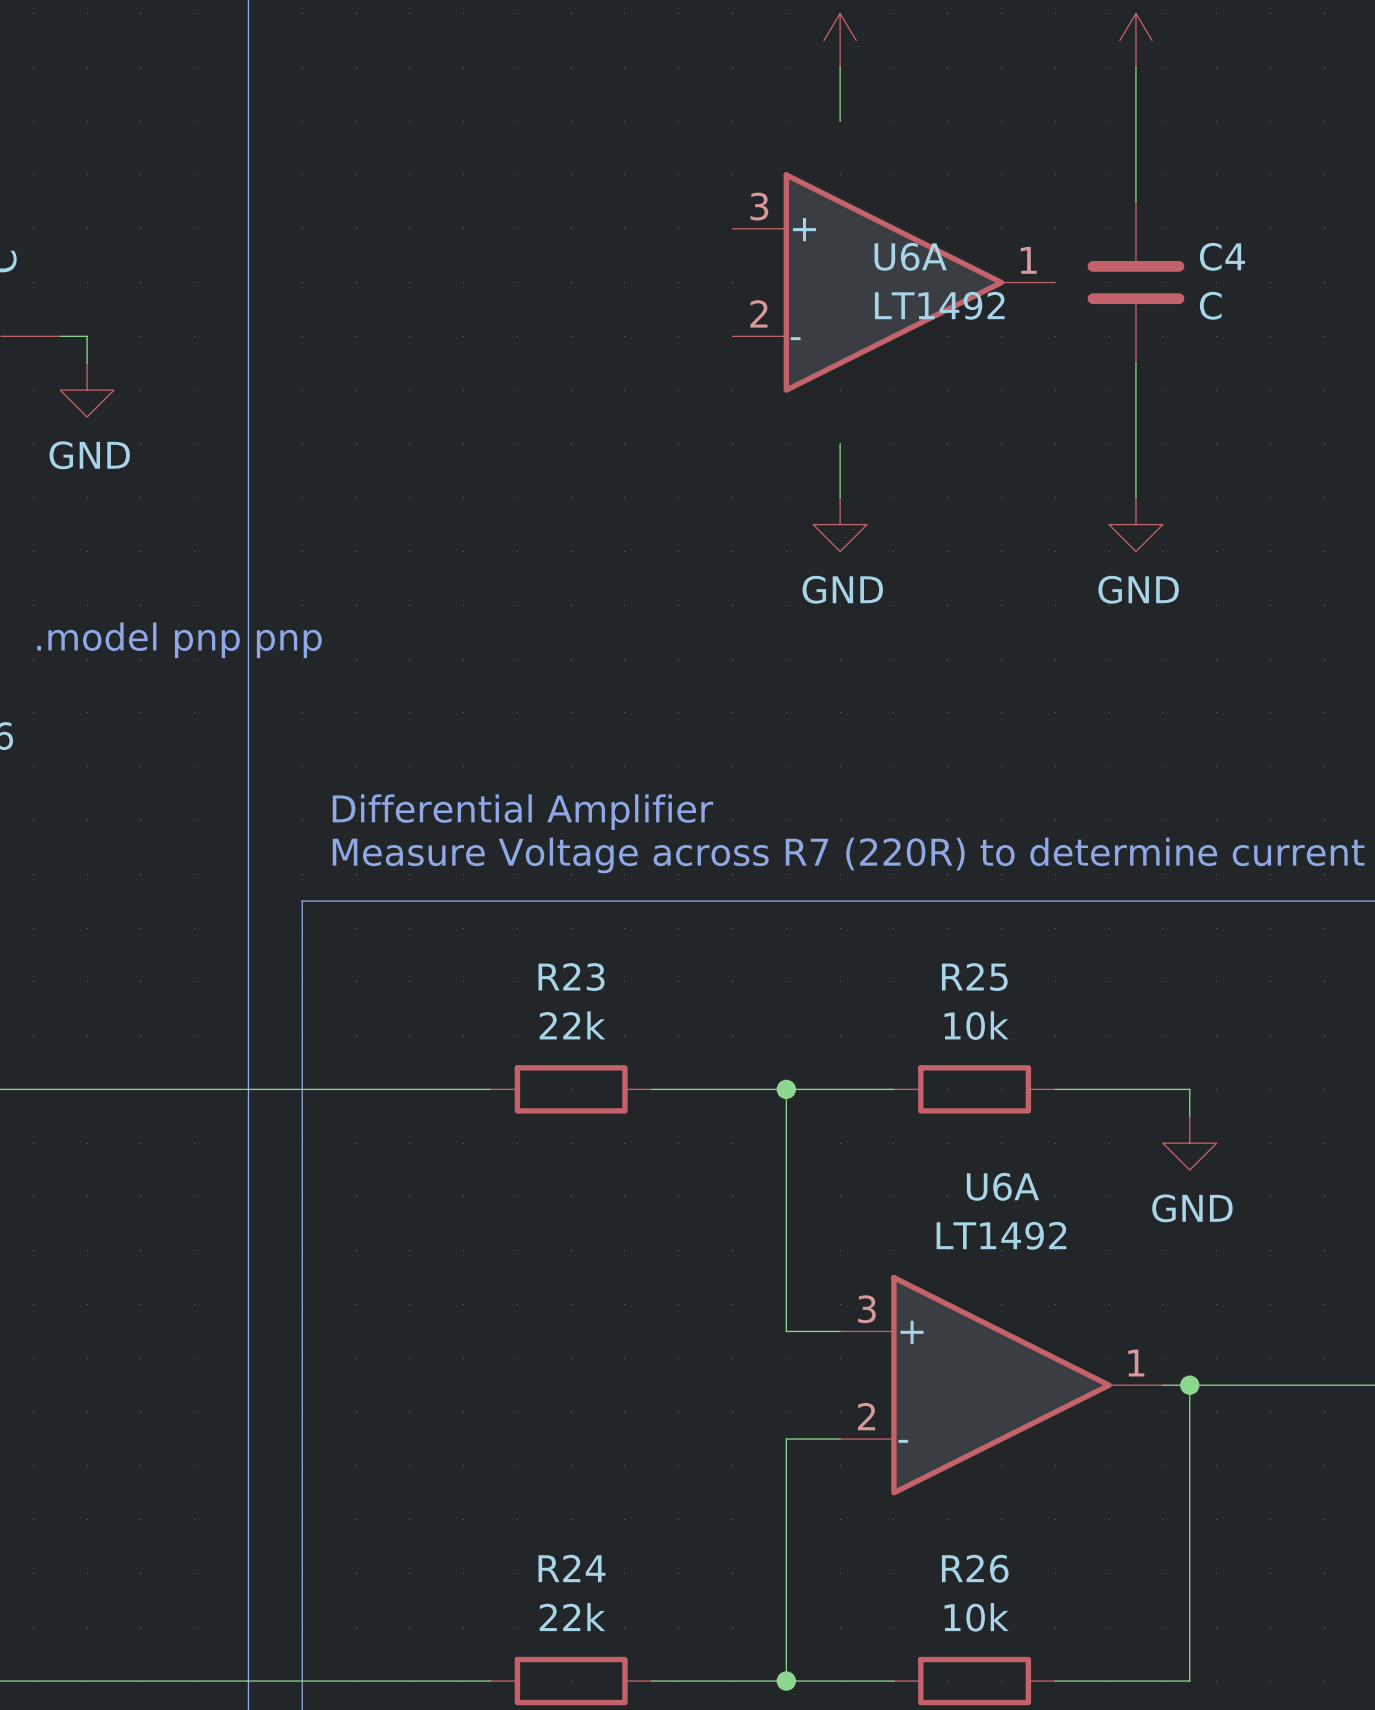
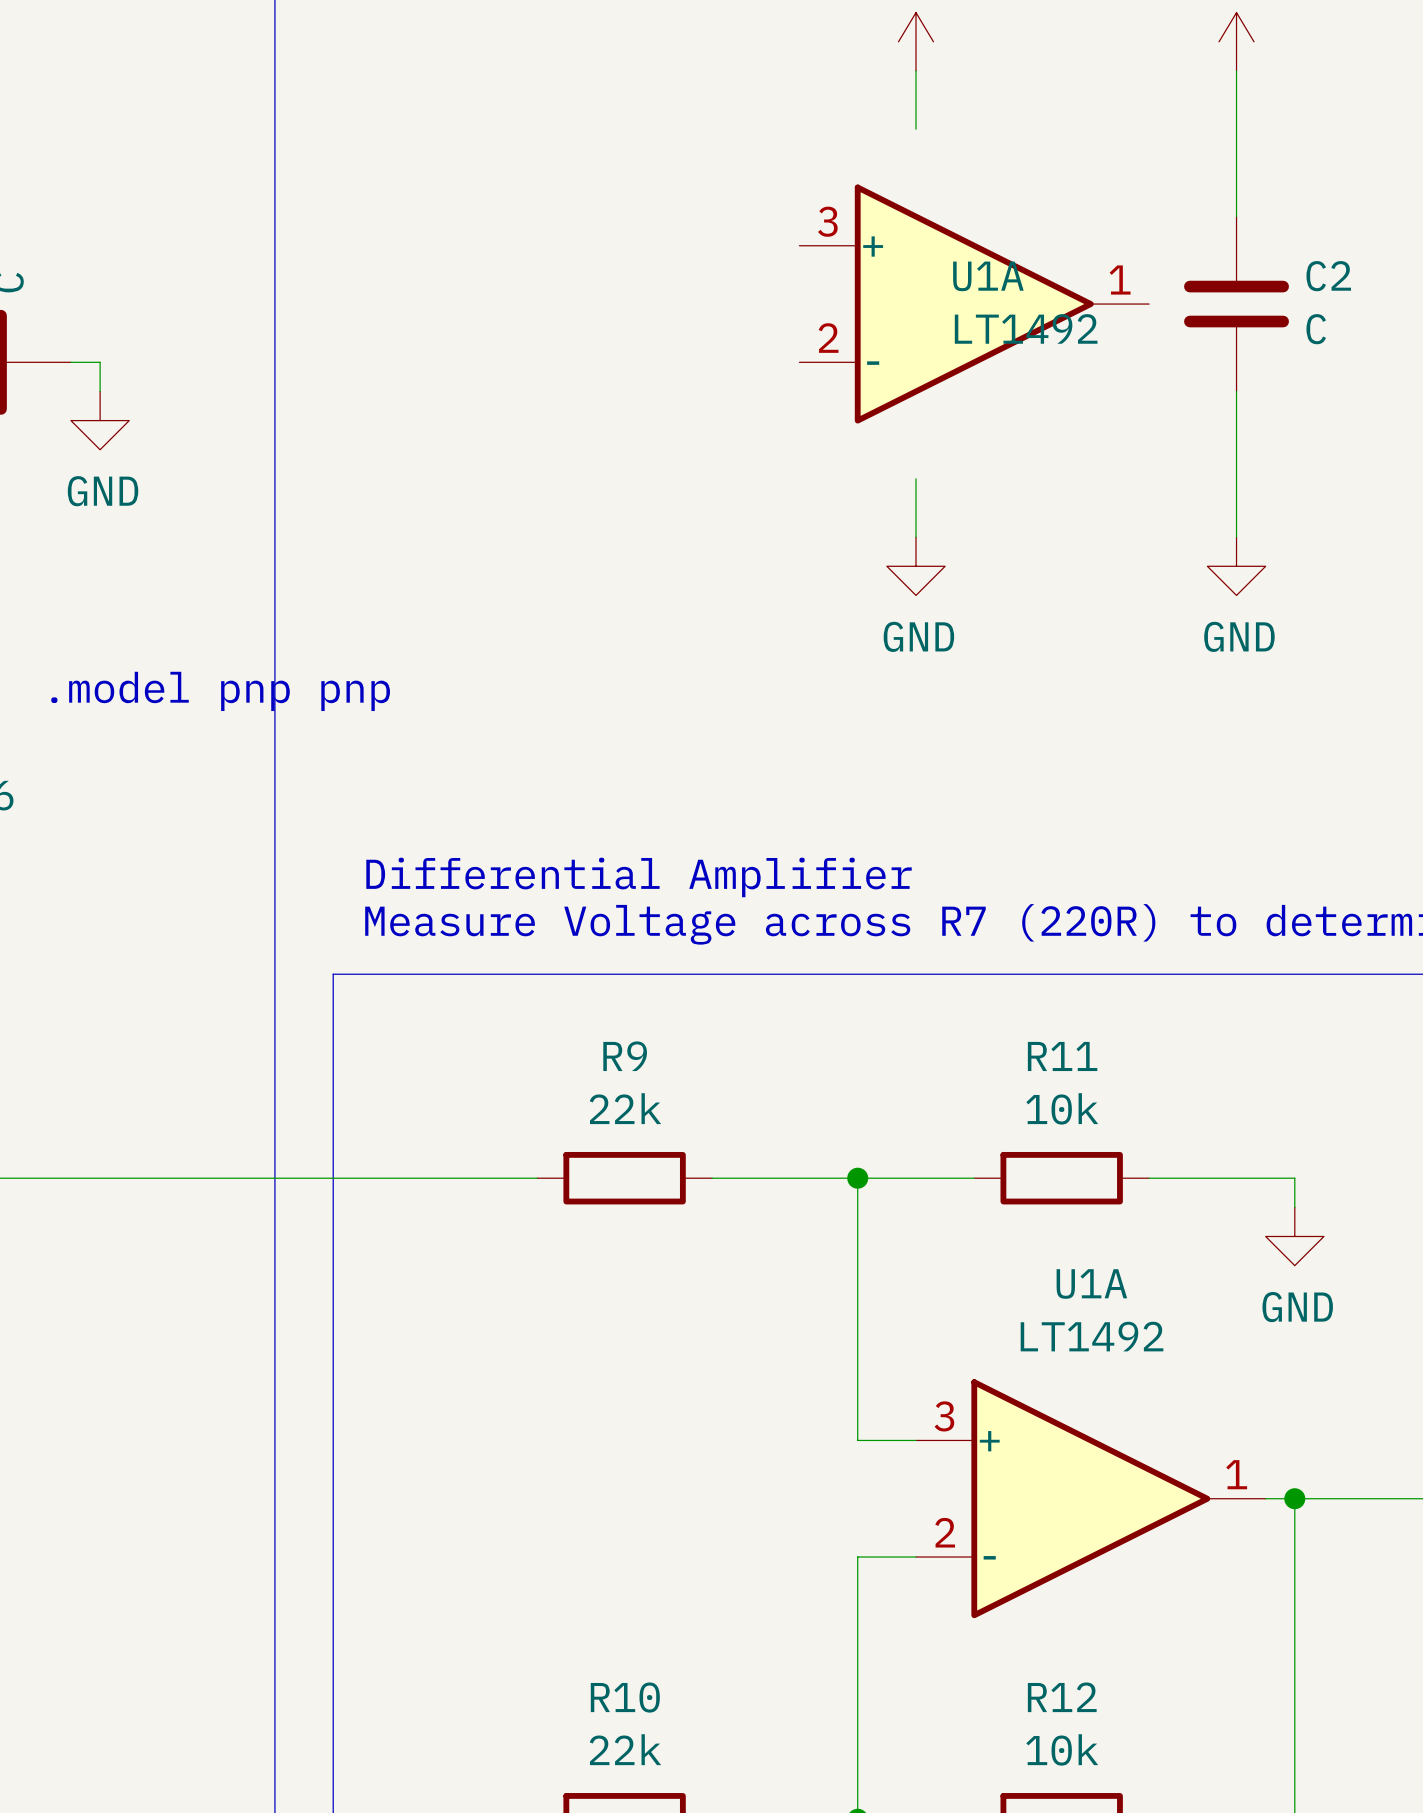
U6A name: U6A (910, 256) -> U1A (988, 276)
C4 name: C4 (1222, 256) -> C2 (1328, 276)
R23 name: R23 (571, 977) -> R9 (625, 1056)
R25 name: R25 (974, 977) -> R11 (1062, 1056)
U6A name: U6A (1002, 1186) -> U1A (1091, 1284)
R24 name: R24 (571, 1568) -> R10 (625, 1697)
R26 name: R26 (975, 1568) -> R12 (1062, 1697)

